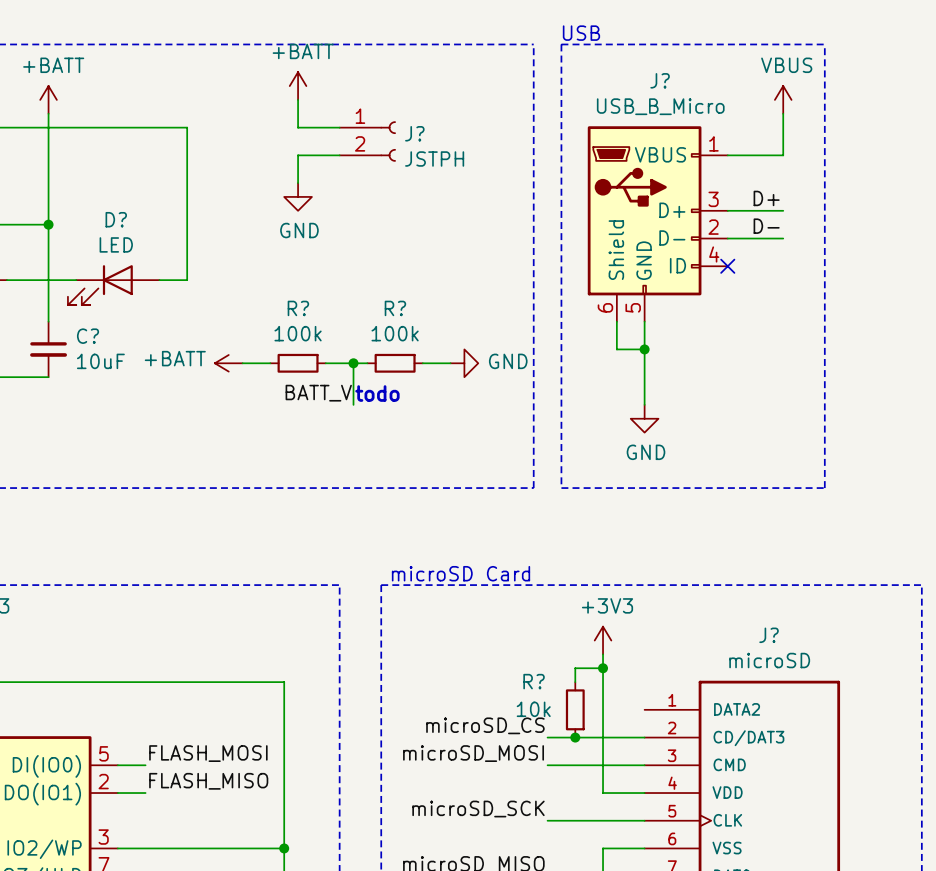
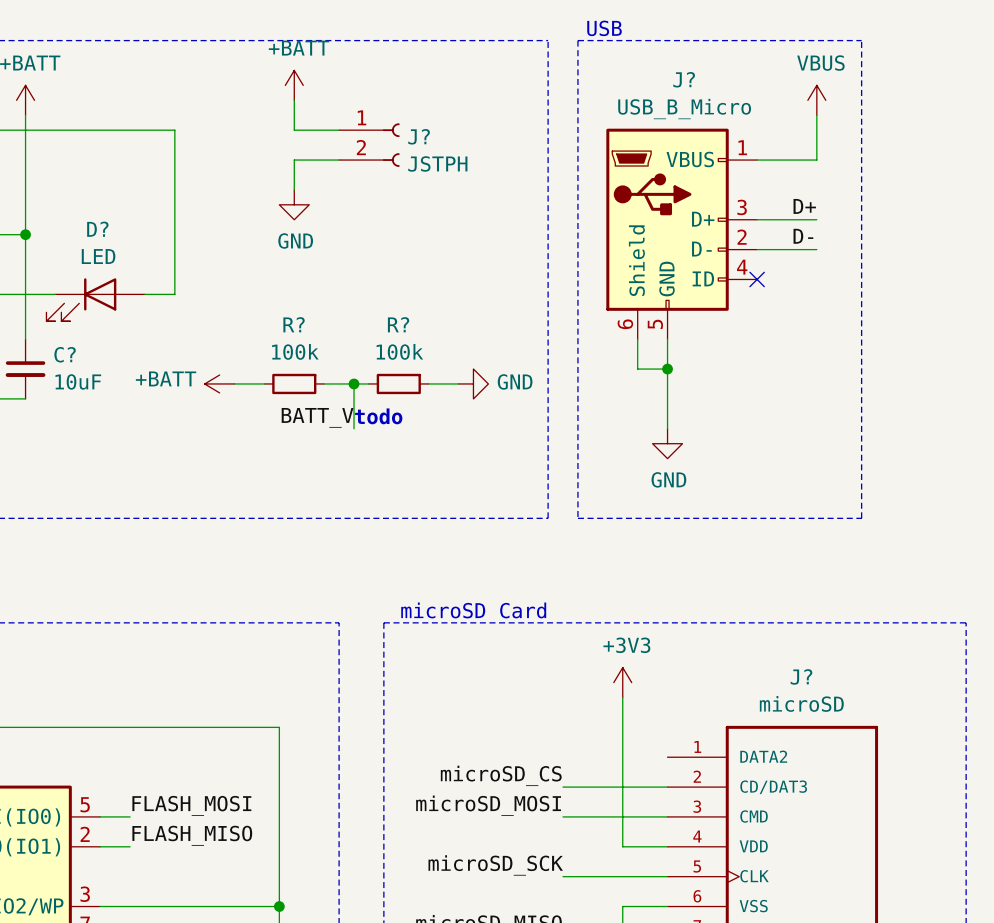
wire: (603, 668) (575, 668) (575, 682) -> none
junction: (603, 668) -> none
R?: 10k (575, 709) -> none
junction: (575, 737) -> none

